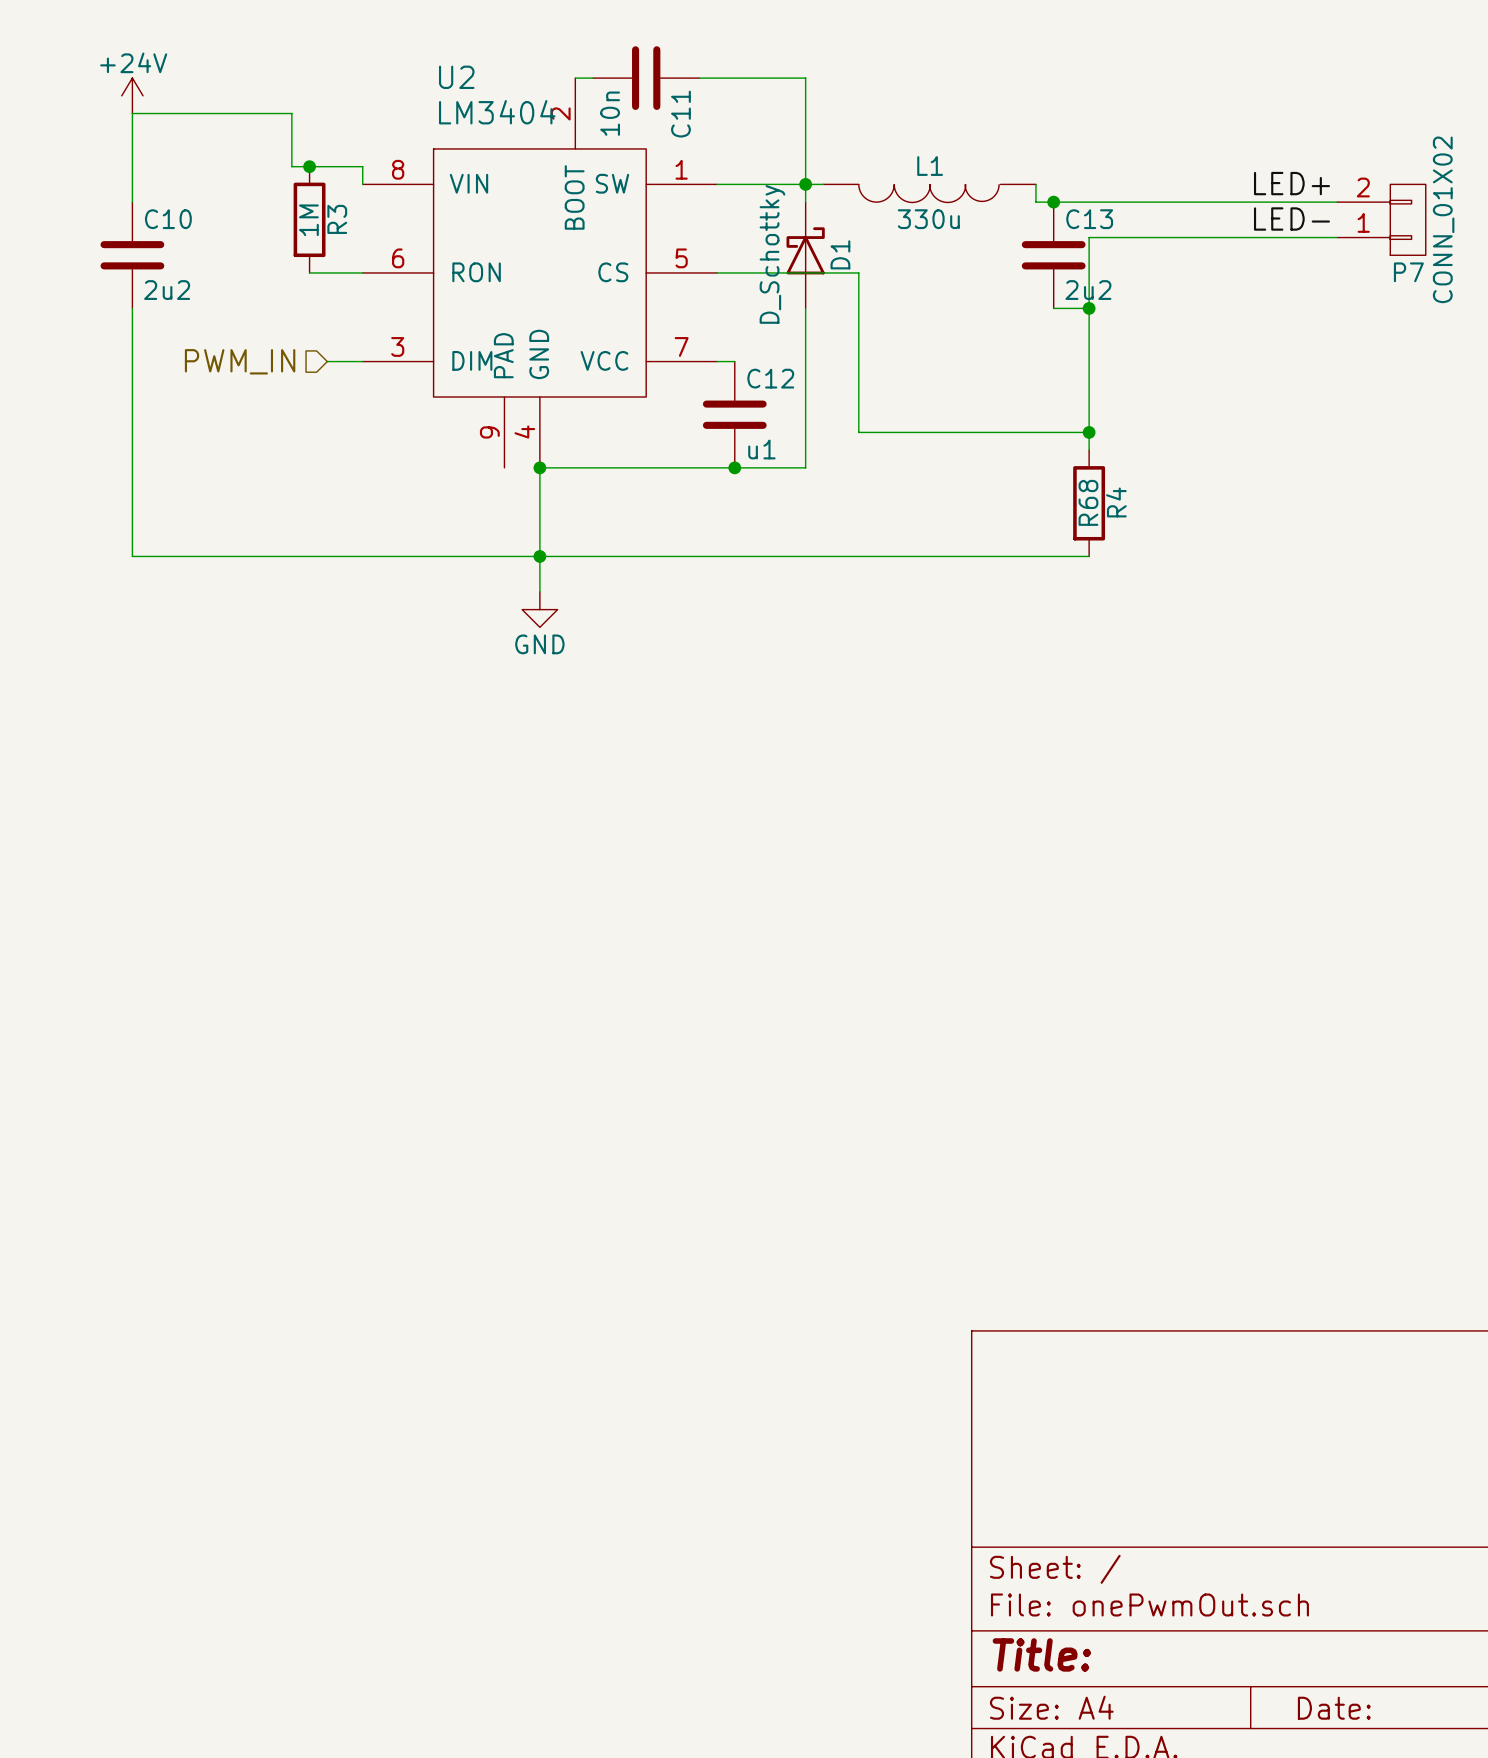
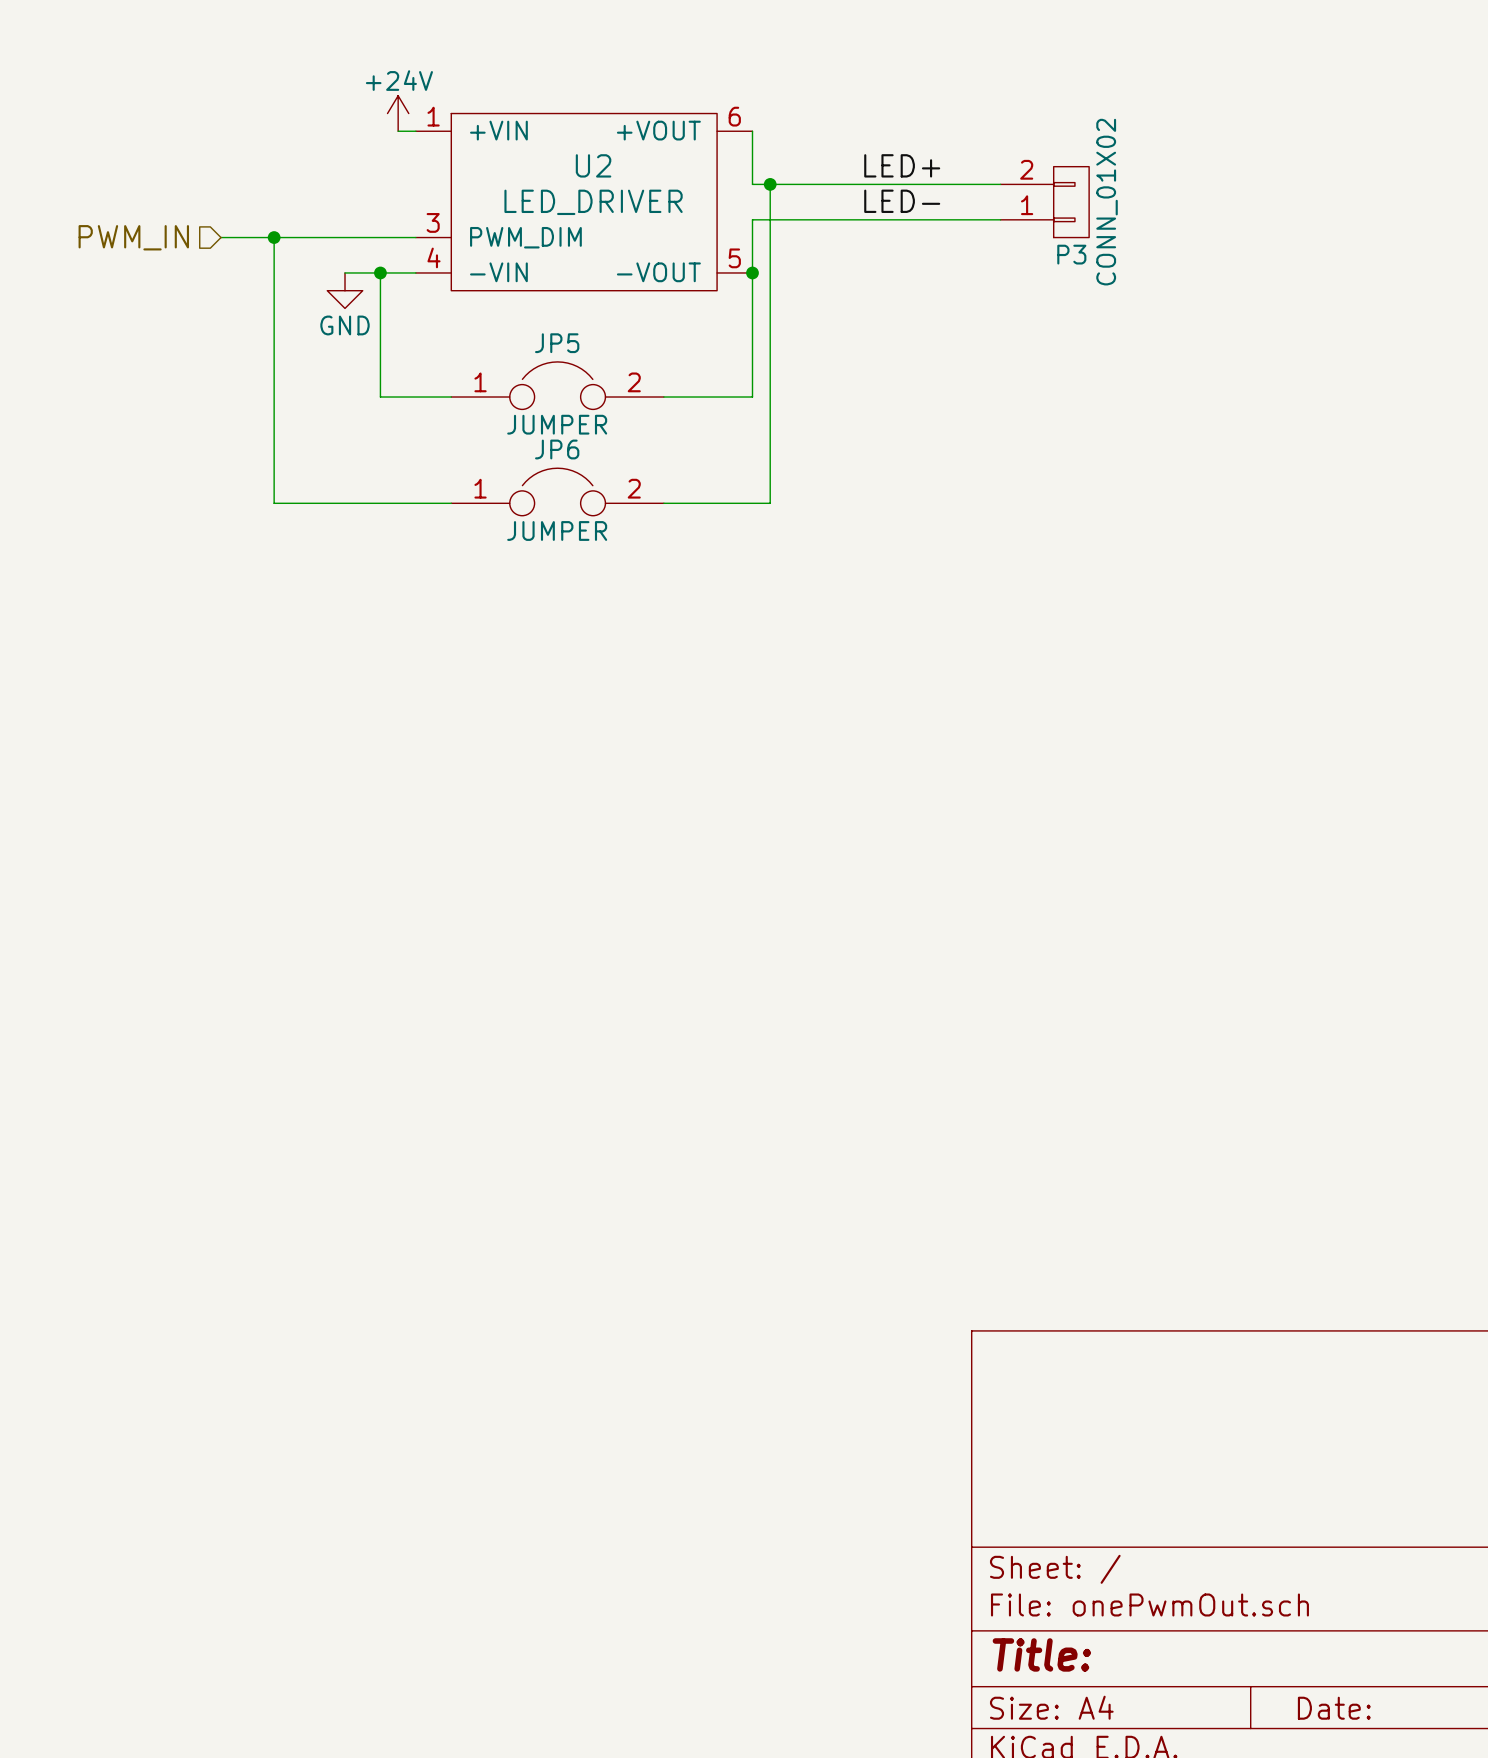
U2 name position: U2 (456, 77) -> U2 (593, 165)
U2 symbol: [362, 78, 718, 468] -> [415, 113, 753, 291]
wire: (575, 78) (593, 78) -> (398, 131) (415, 131)
C11: 10n (646, 78) -> none
wire: (699, 78) (805, 78) (805, 202) -> none
power symbol position: +24V (132, 95) -> +24V (398, 113)
U2 value: LM3404 (497, 112) -> LED_DRIVER (593, 202)
label: none -> LED+ (902, 165)
junction: (309, 166) -> none
label: LED+ (1291, 183) -> none
wire: (362, 184) (362, 166) (291, 166) (291, 113) (132, 113) (132, 202) -> none
wire: (717, 184) (752, 184) -> (752, 131) (752, 184)
wire: none -> (770, 184) (770, 503) (663, 503)
junction position: (805, 184) -> (770, 184)
wire: none -> (823, 184) (1000, 184)
wire: (1035, 184) (1035, 202) (1337, 202) -> none
L1: 330u (929, 193) -> none
label: none -> LED- (902, 201)
P3: none -> CONN_01X02 (1044, 202)
junction: (1053, 202) -> none
R3: 1M (309, 219) -> none
wire: none -> (1000, 219) (752, 219) (752, 397) (663, 397)
label: LED- (1291, 219) -> none
P7: CONN_01X02 (1381, 219) -> none
wire: none -> (220, 237) (415, 237)
wire: none -> (274, 237) (274, 503) (451, 503)
junction: none -> (274, 237)
wire: (1337, 237) (1089, 237) (1089, 450) -> none
C10: 2u2 (132, 255) -> none
D1: D_Schottky (805, 255) -> none
C13: 2u2 (1053, 255) -> none
wire: (309, 272) (345, 272) -> none
wire: none -> (380, 272) (380, 397) (451, 397)
junction: none -> (380, 272)
wire: (717, 272) (858, 272) (858, 432) (1089, 432) -> none
junction: none -> (752, 272)
power symbol: none -> GND (345, 290)
wire: (132, 308) (132, 556) (1089, 556) -> none
wire: (805, 308) (805, 467) (539, 467) (539, 591) -> none
wire: (1053, 308) (1089, 308) -> none
junction: (1089, 308) -> none
hierarchical label position: PWM_IN (240, 361) -> PWM_IN (133, 237)
wire: (327, 361) (362, 361) -> none
wire: (717, 361) (734, 361) -> none
JP5: none -> JUMPER (557, 385)
C12: u1 (734, 414) -> none
junction: (1089, 432) -> none
junction: (539, 467) -> none
junction: (734, 467) -> none
JP6: none -> JUMPER (557, 491)
R4: R68 (1089, 503) -> none
junction: (539, 556) -> none
power symbol: GND (539, 609) -> none

